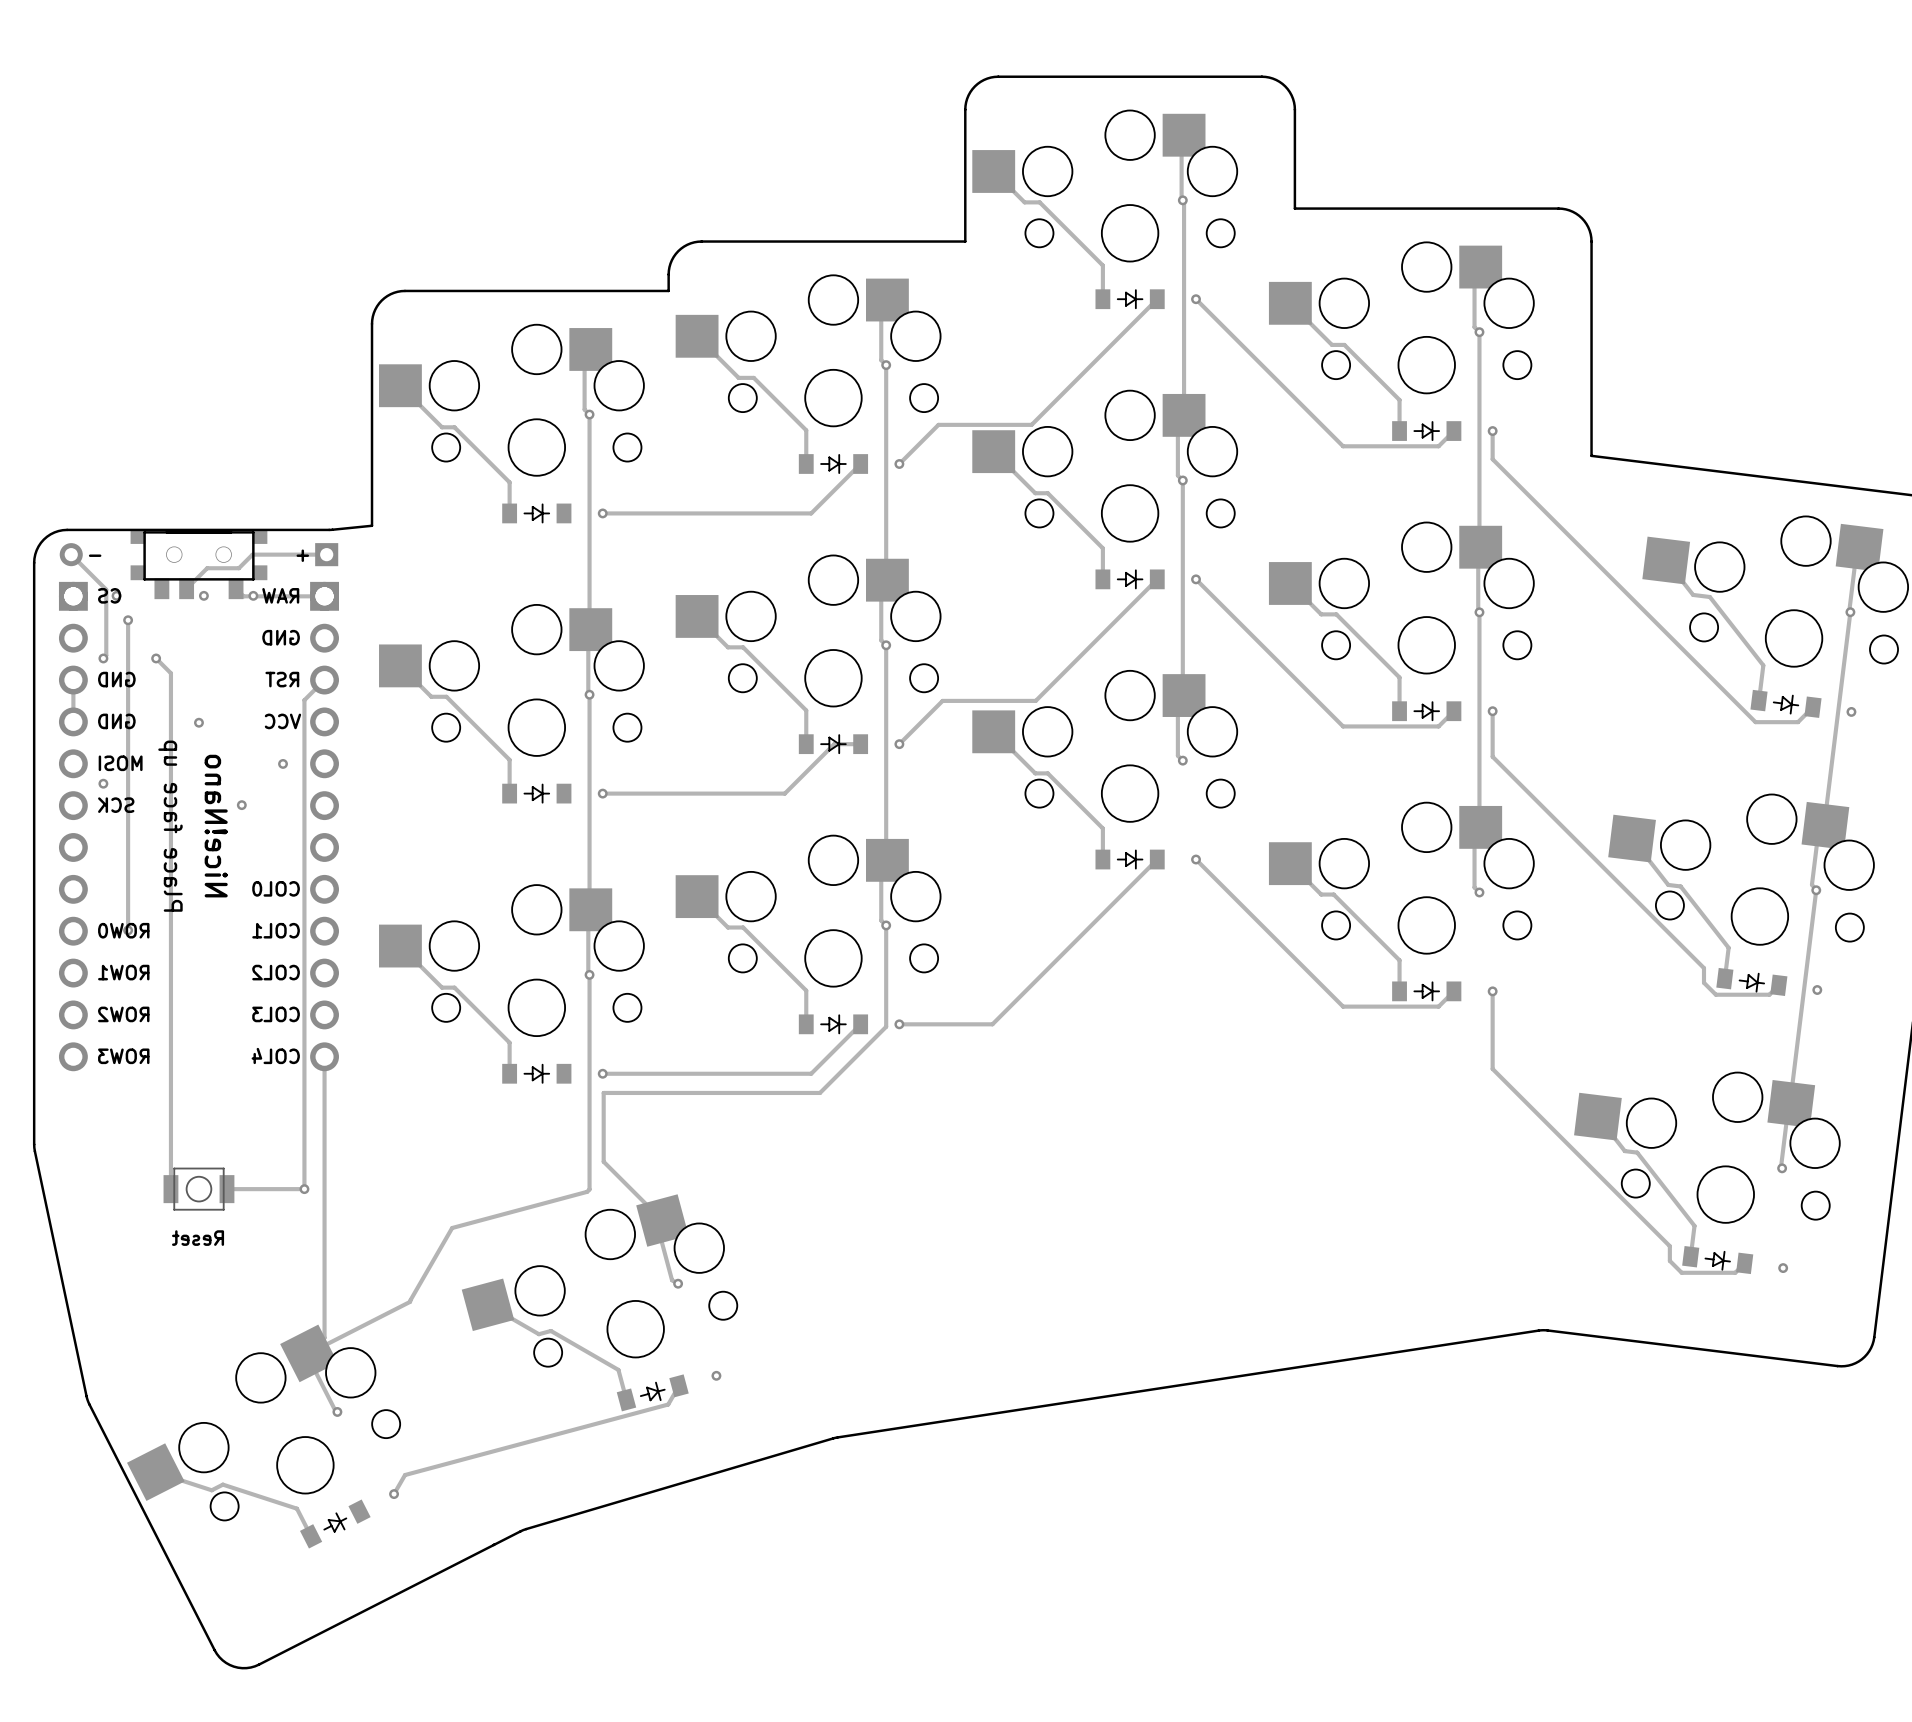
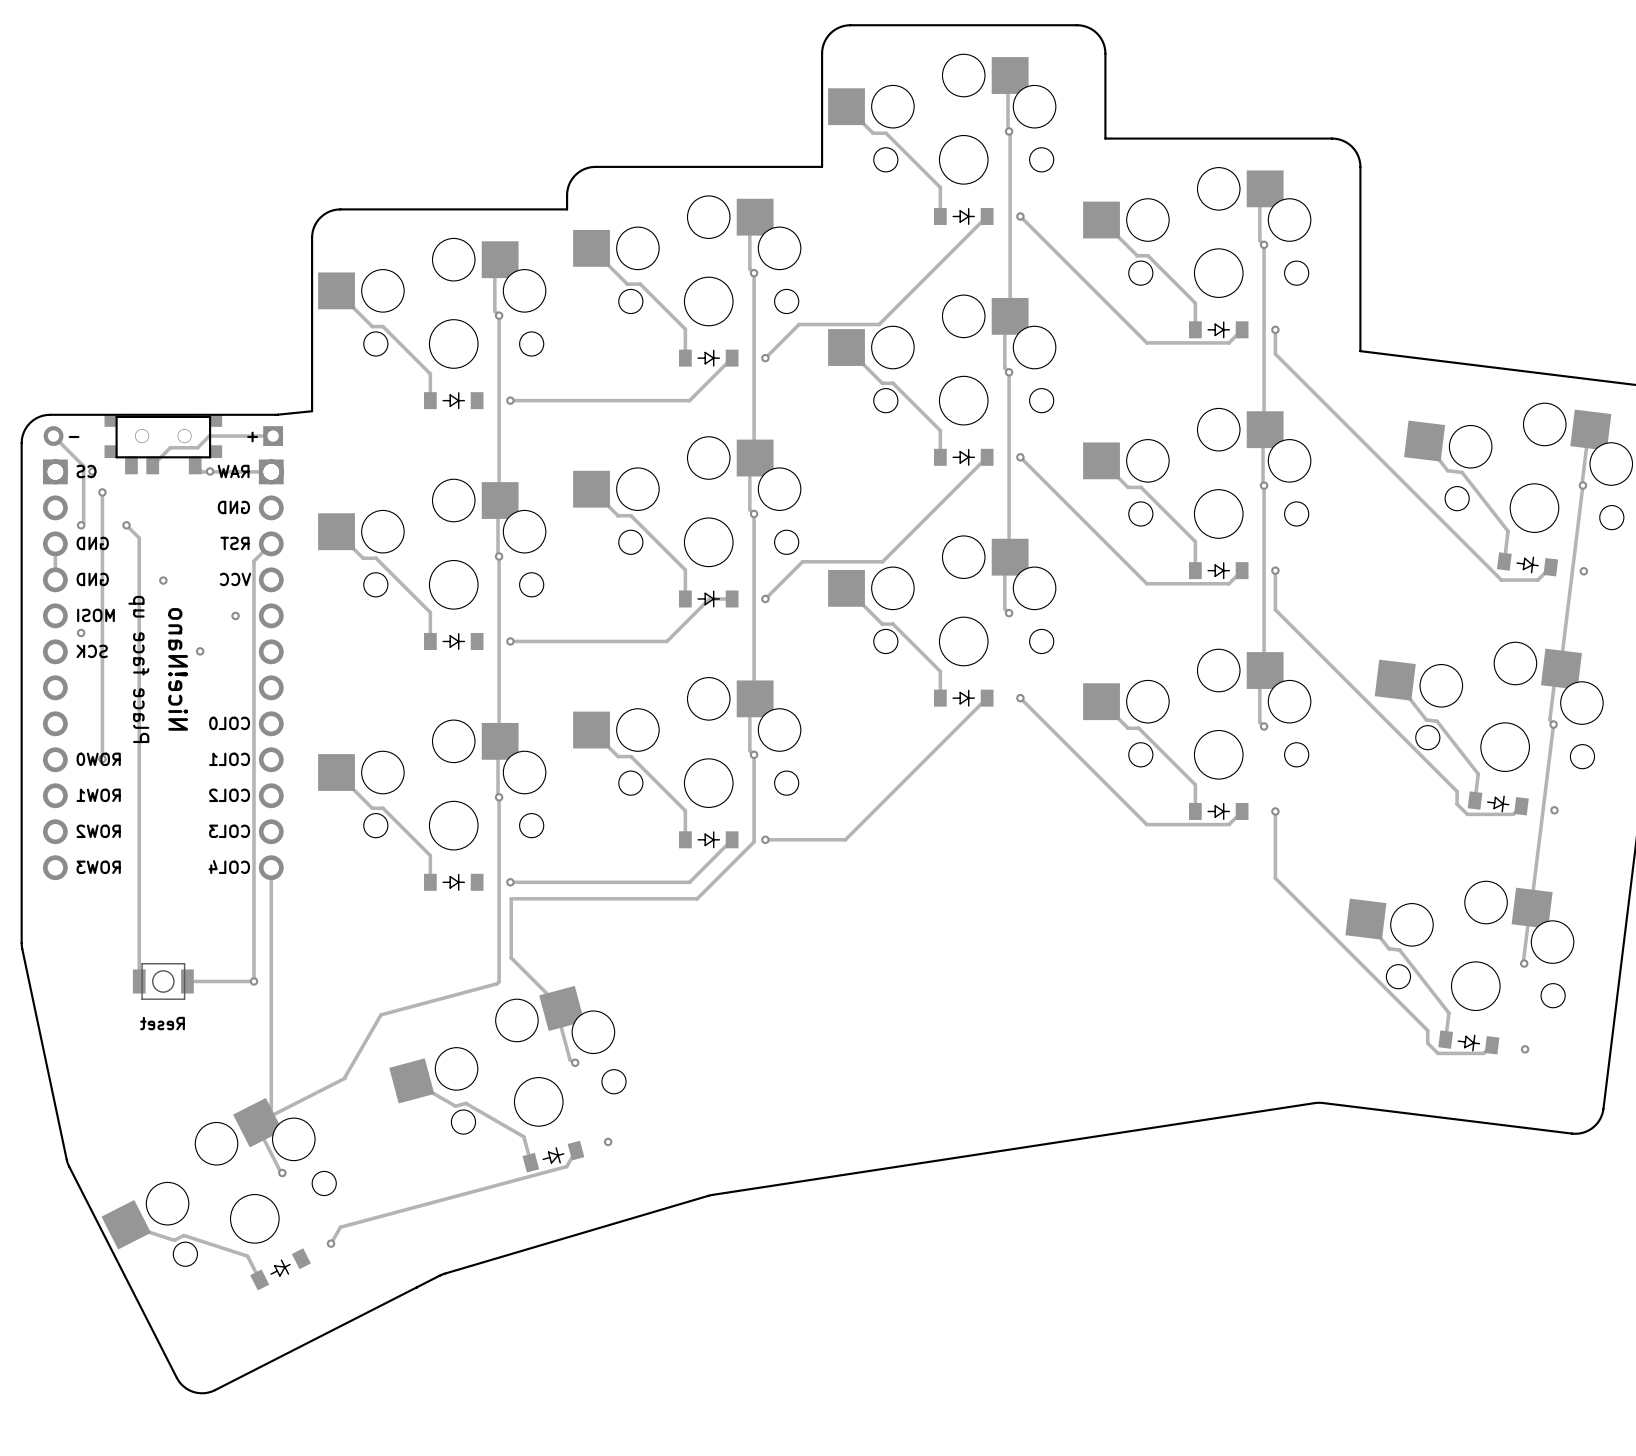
part: (203, 595) -> none

